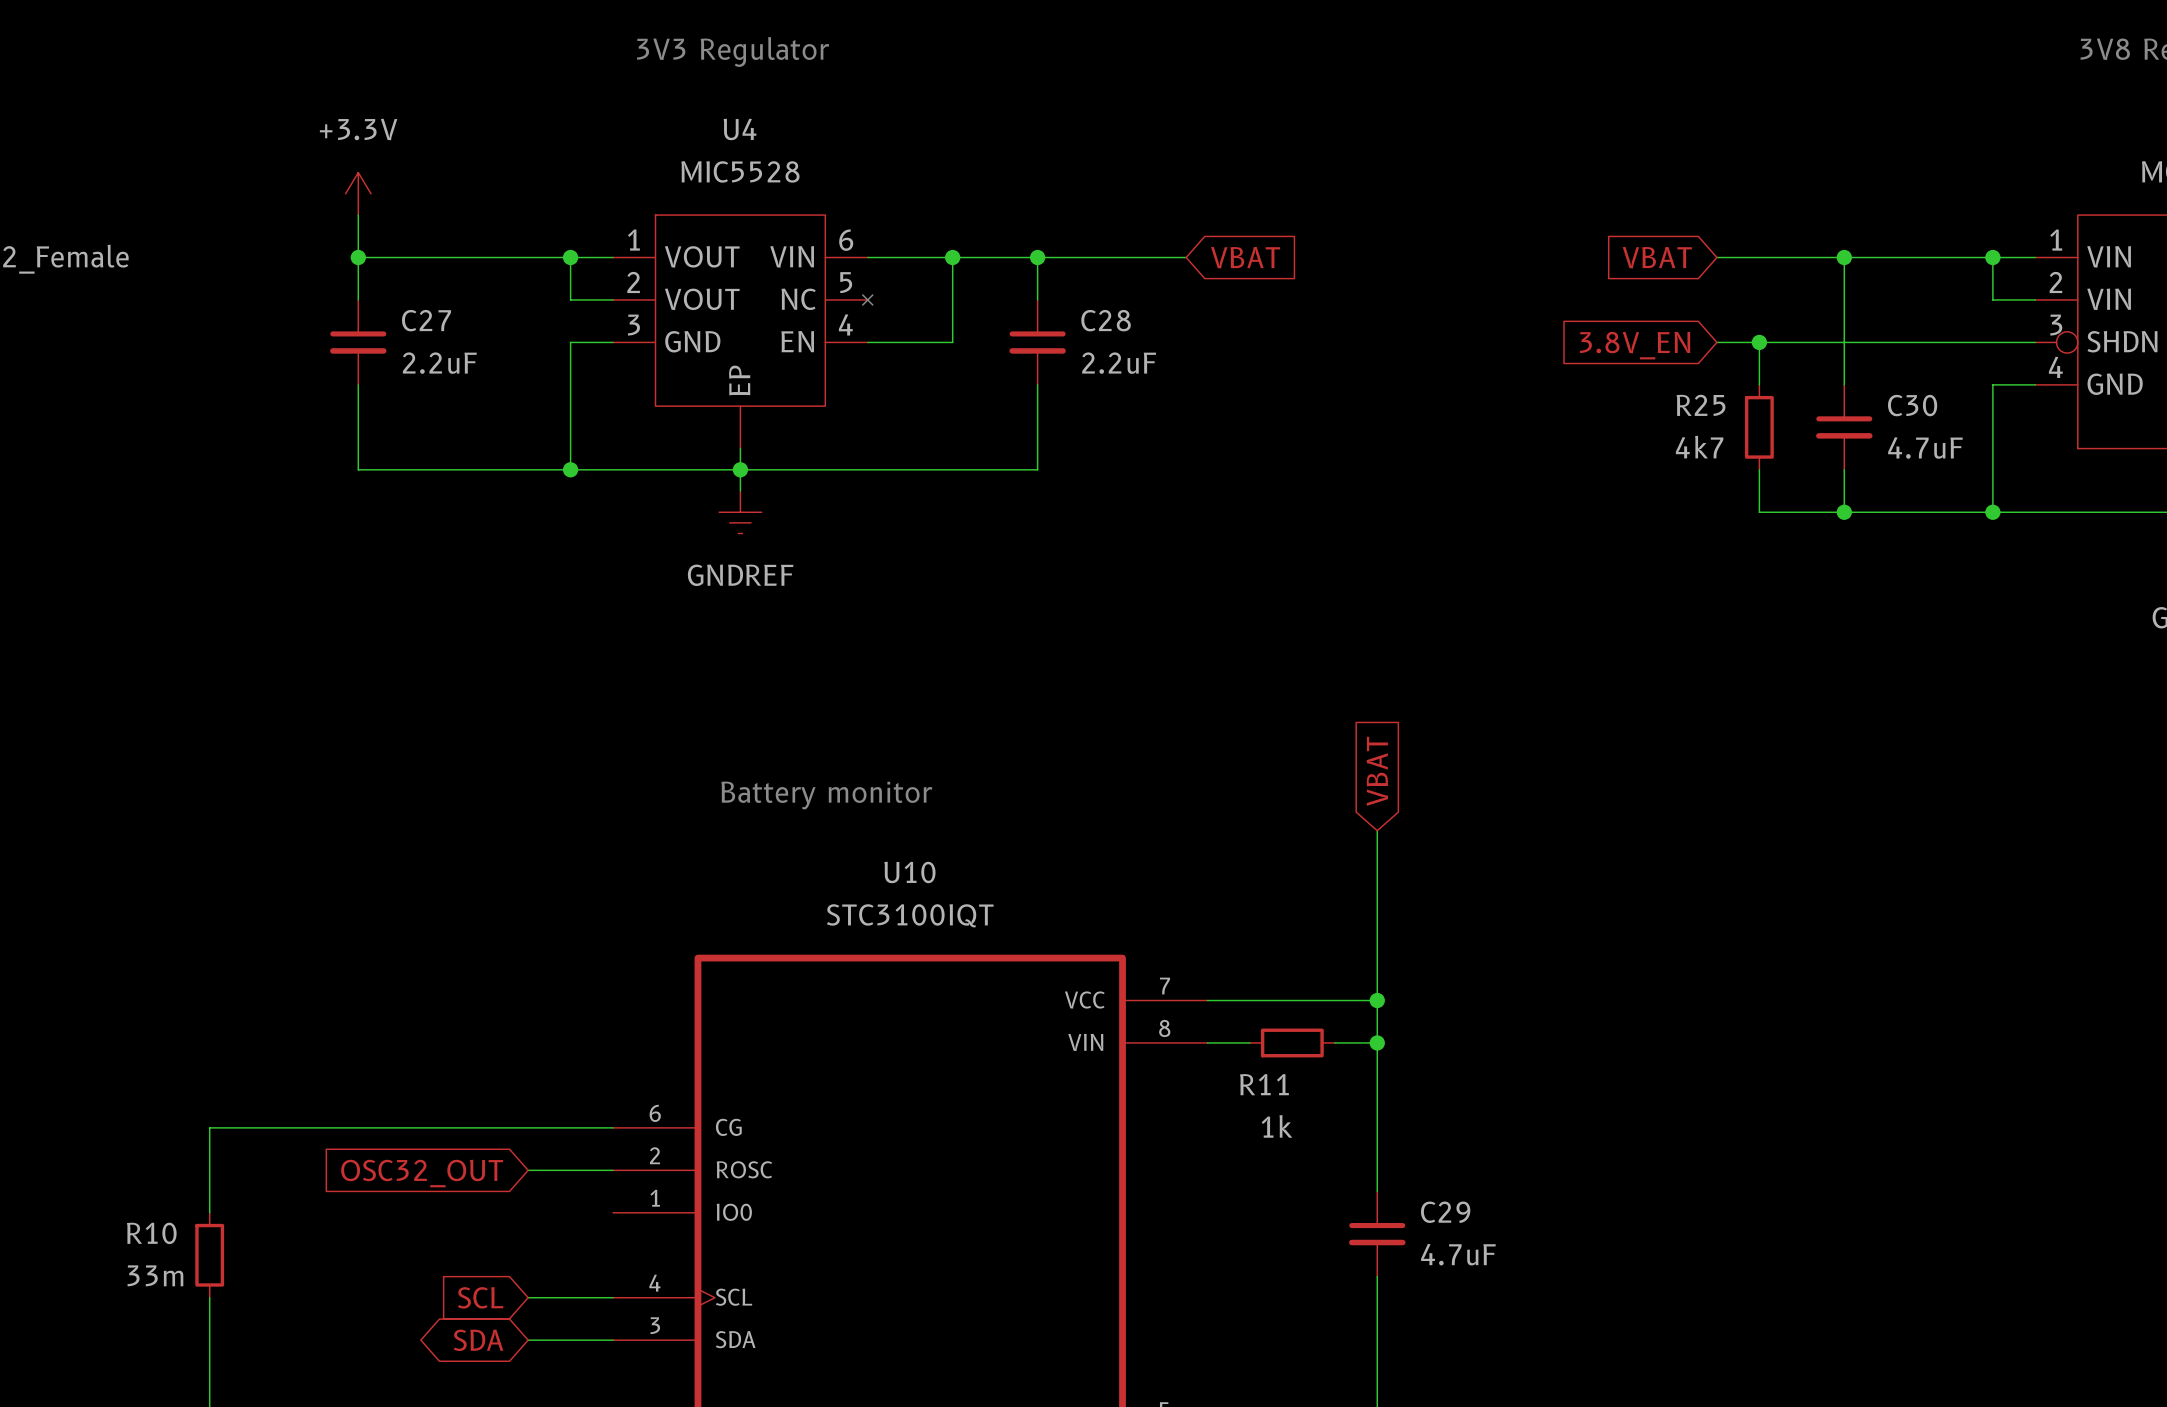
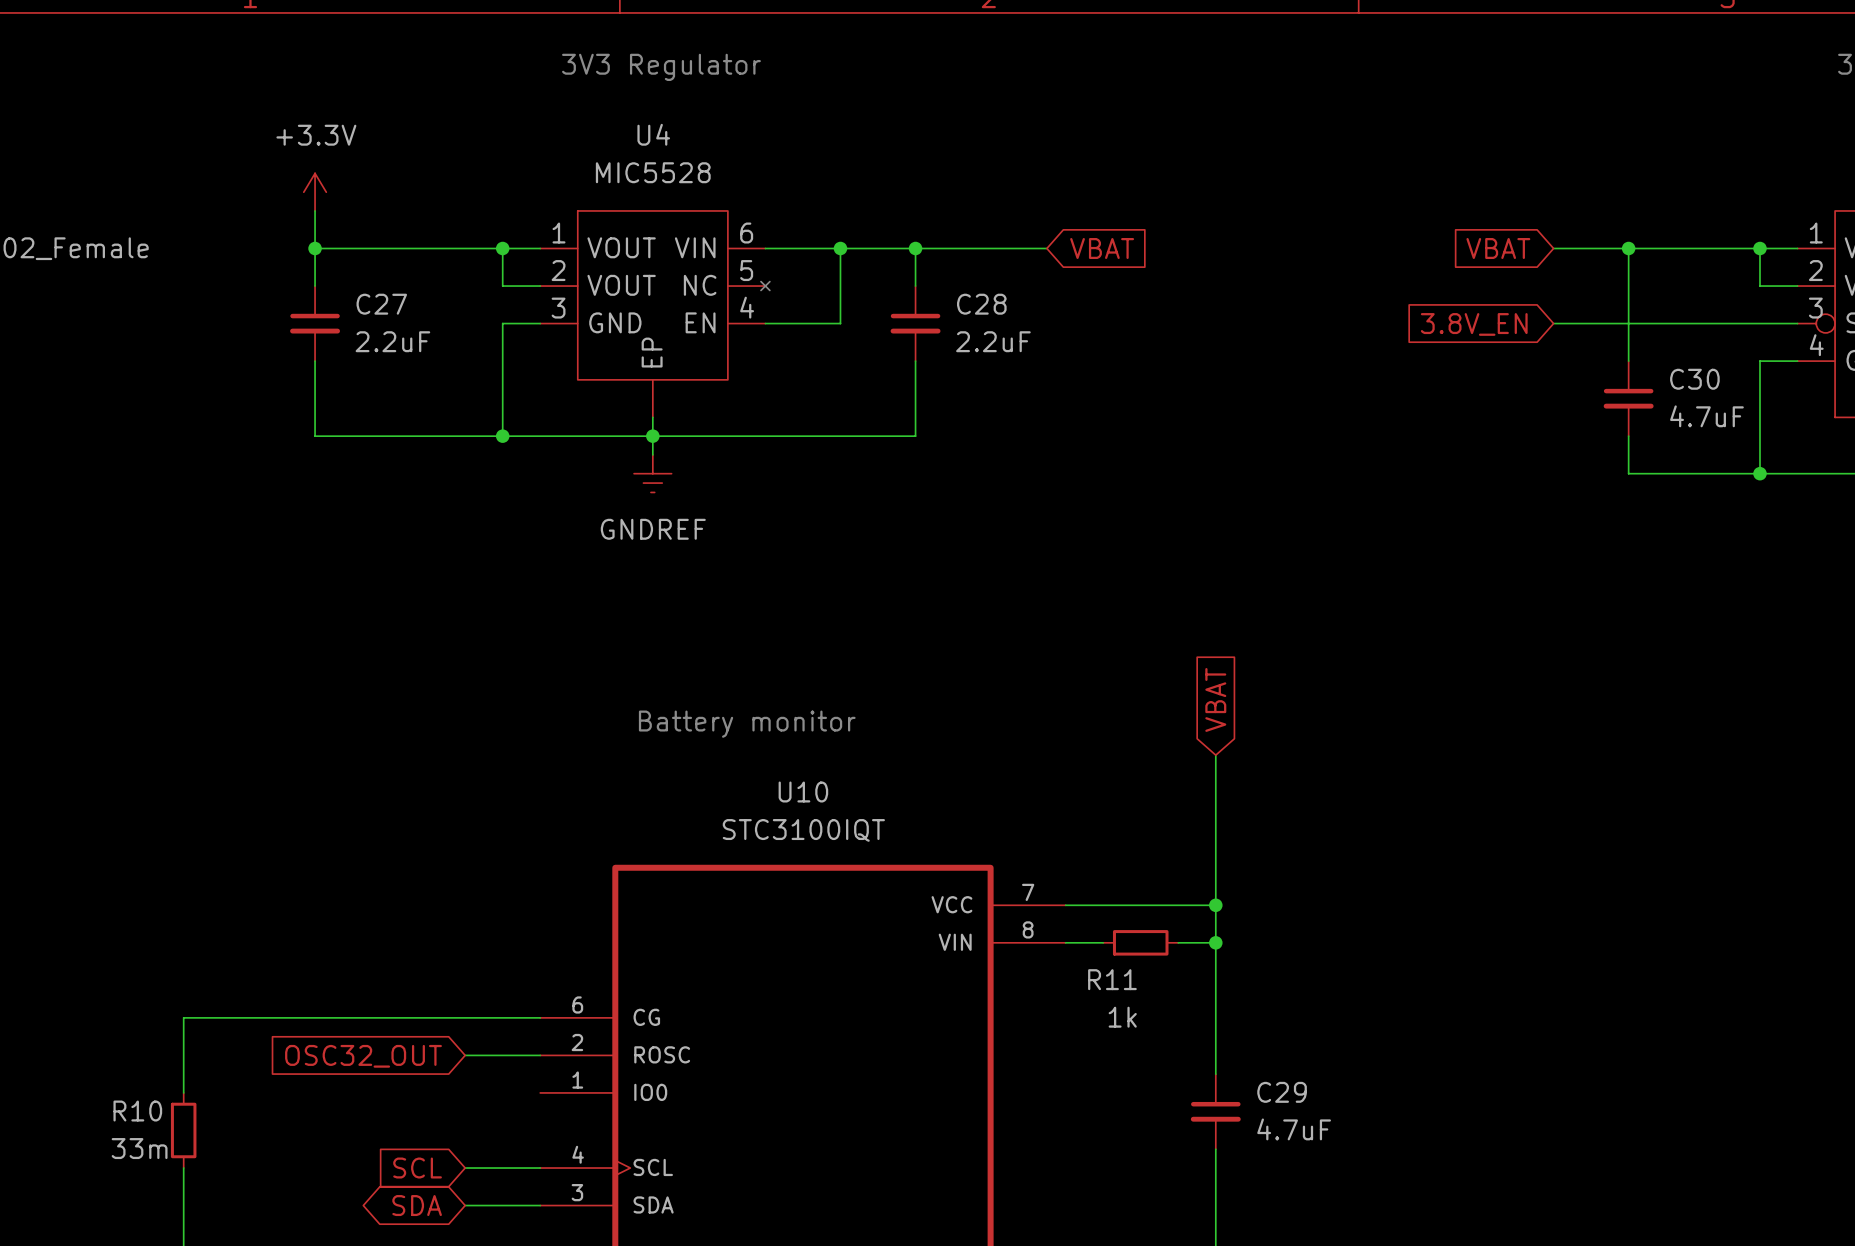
global label position: VBAT (1657, 257) -> VBAT (1498, 248)
wire: (1716, 257) (1759, 257) -> none
wire: (1716, 342) (1759, 342) (1759, 384) -> none
junction: (1759, 342) -> none
global label position: 3.8V_EN (1635, 345) -> 3.8V_EN (1474, 324)
R25: 4k7 (1759, 427) -> none
wire: (1759, 469) (1759, 512) (1844, 512) -> none
junction: (1844, 512) -> none

